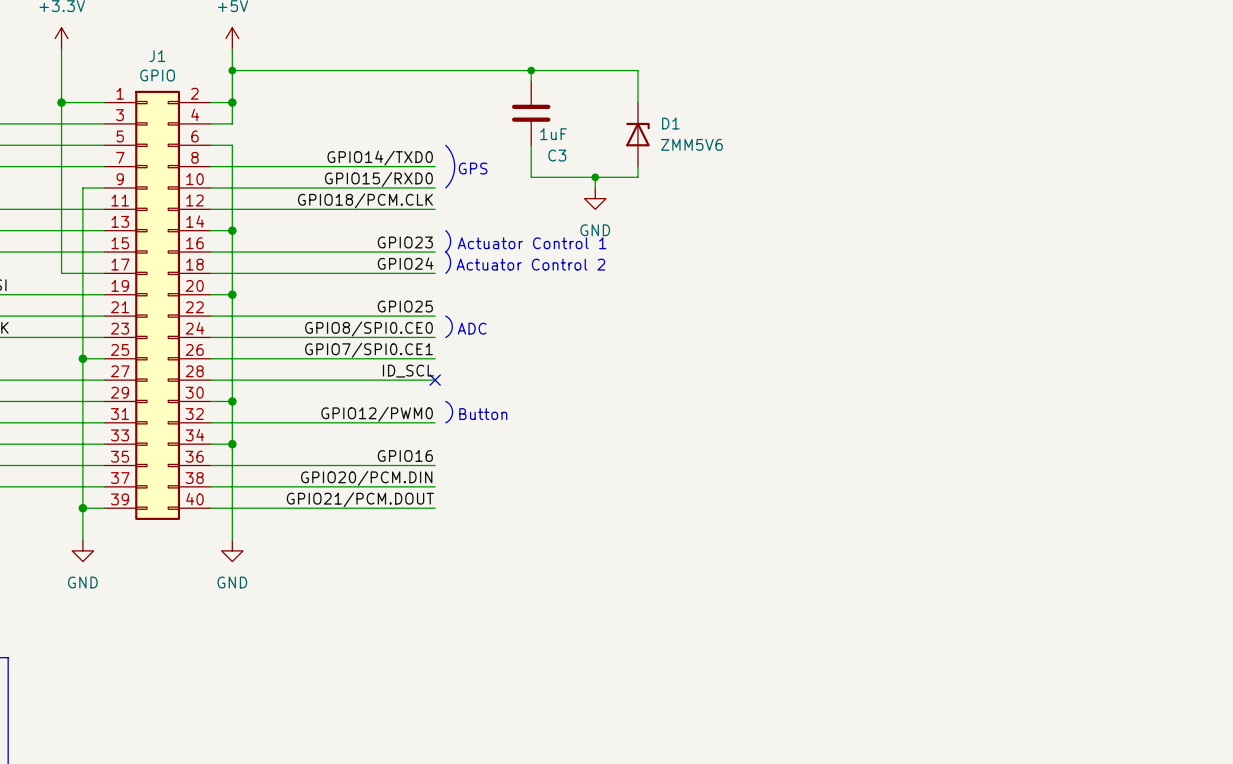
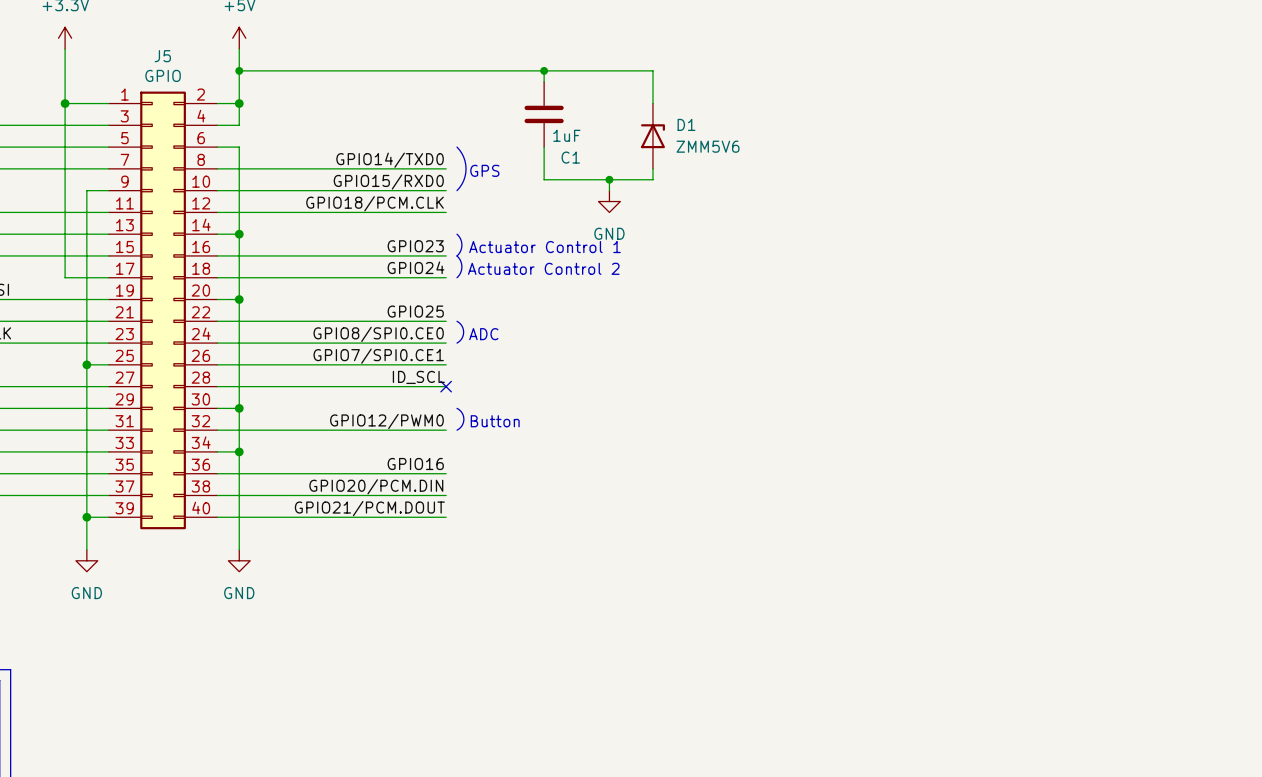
J1 name: J1 (157, 56) -> J5 (162, 56)
C3 name: C3 (557, 155) -> C1 (570, 157)

